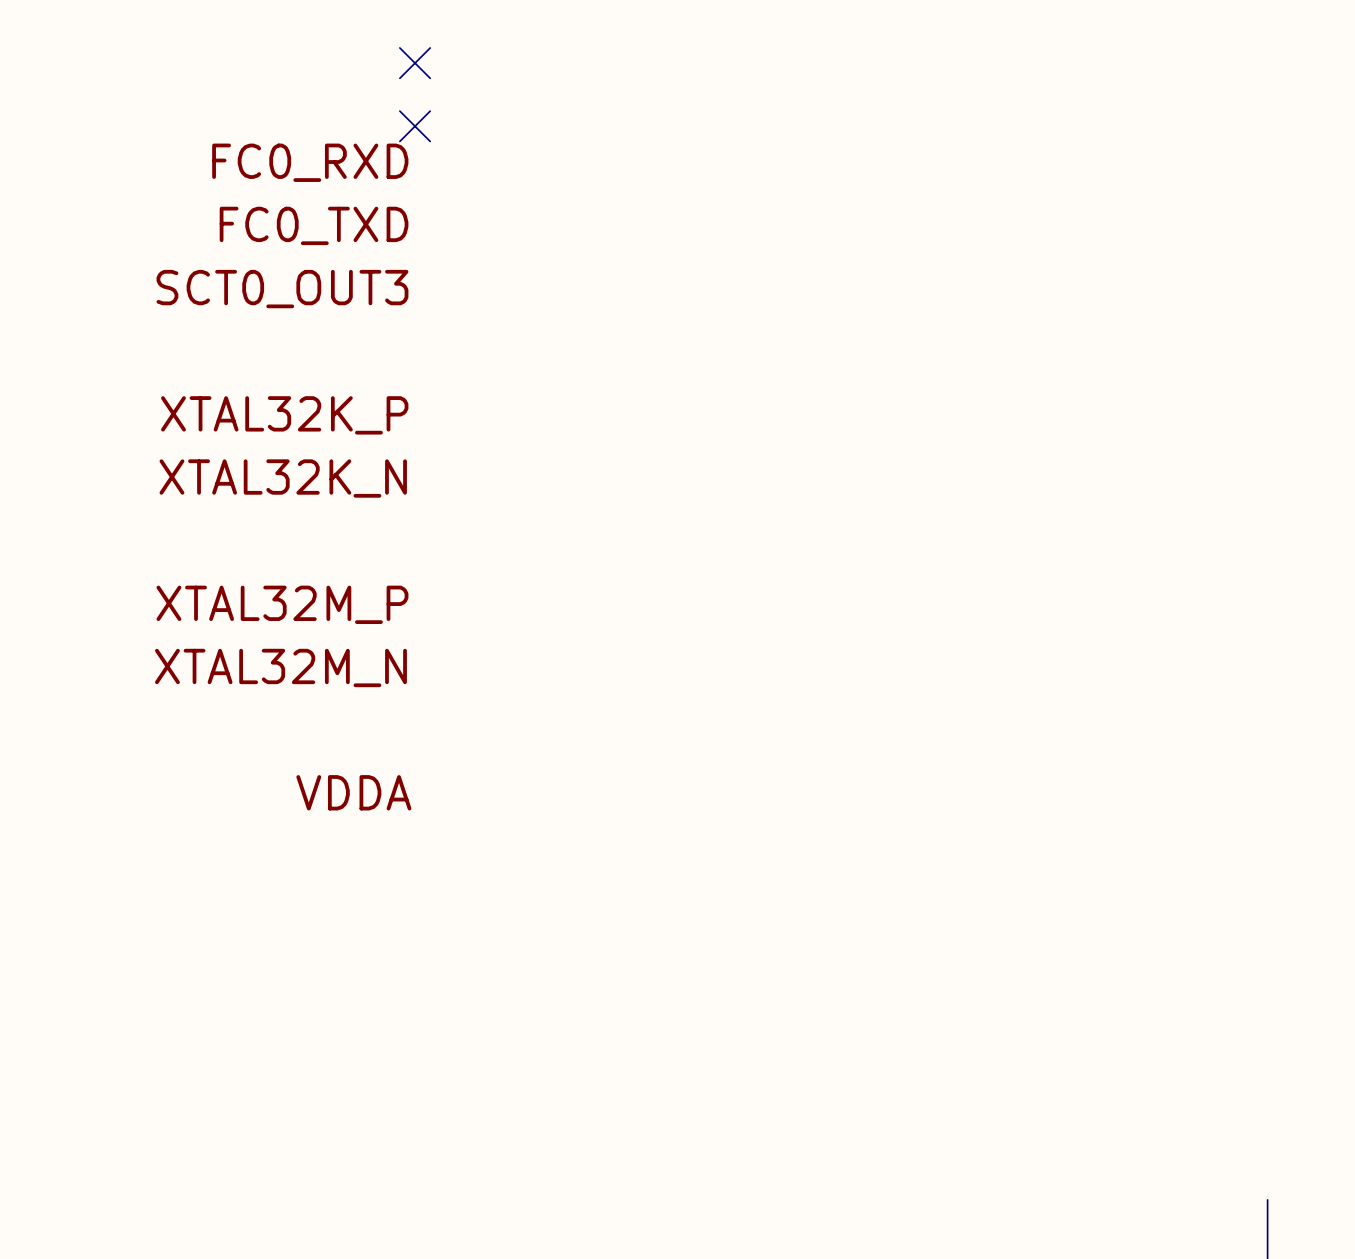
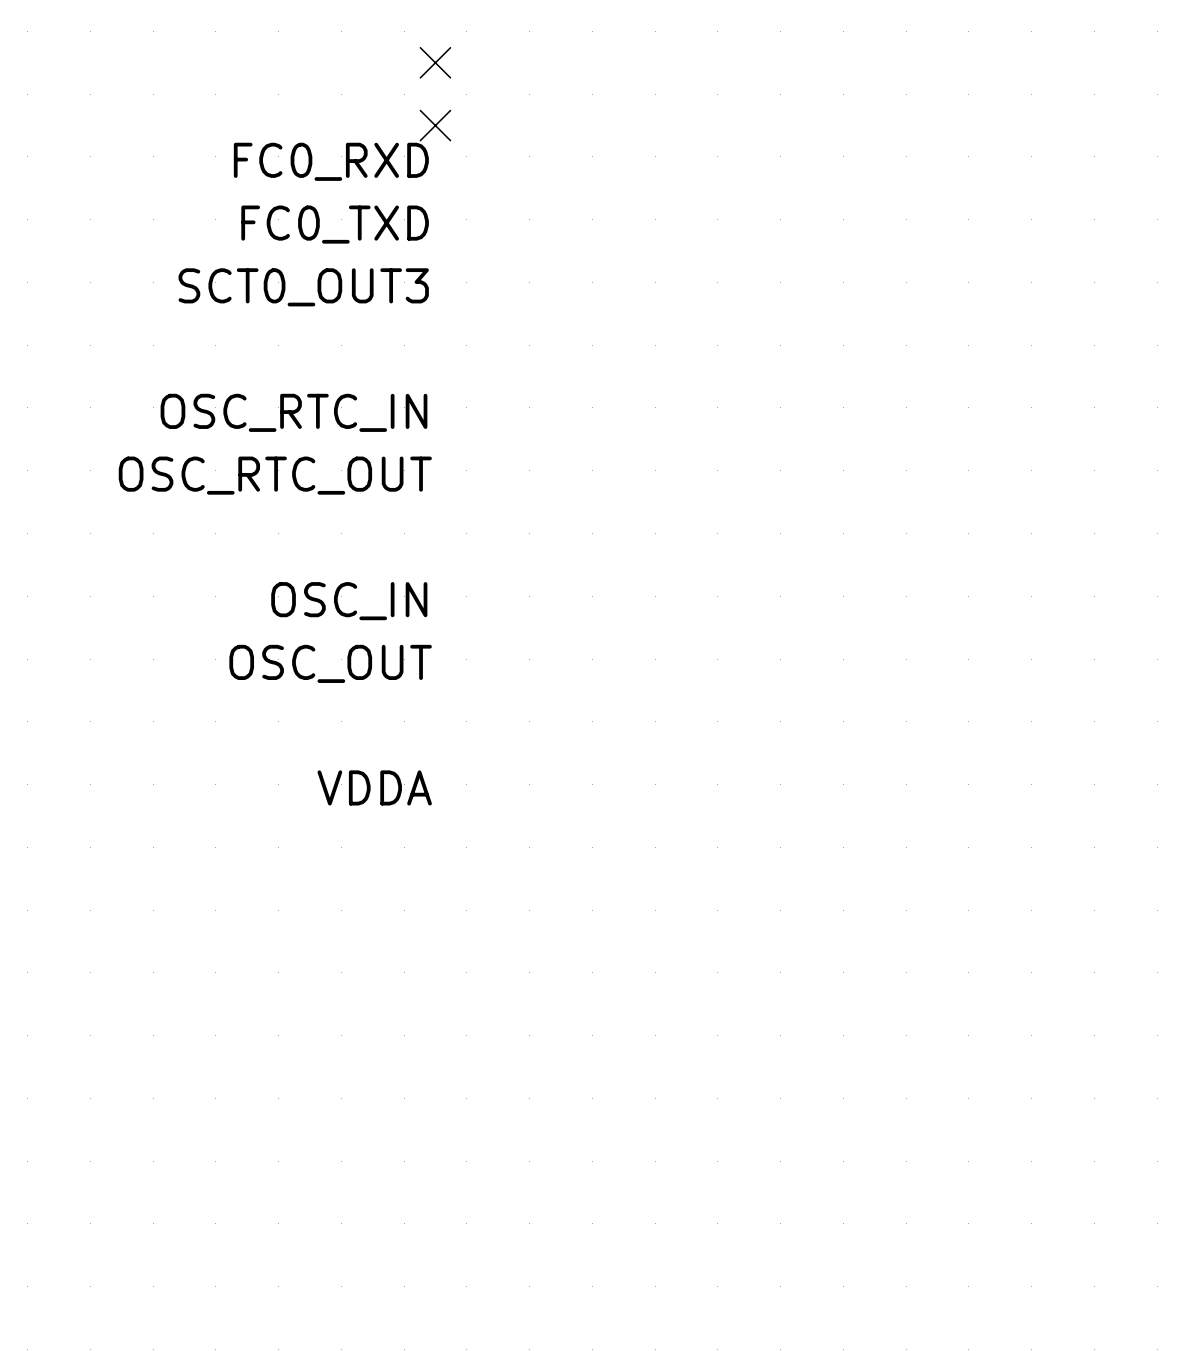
label: XTAL32K_P (284, 415) -> OSC_RTC_IN (294, 412)
label: XTAL32K_N (283, 478) -> OSC_RTC_OUT (275, 475)
label: XTAL32M_P (282, 604) -> OSC_IN (349, 601)
label: XTAL32M_N (280, 667) -> OSC_OUT (330, 663)

